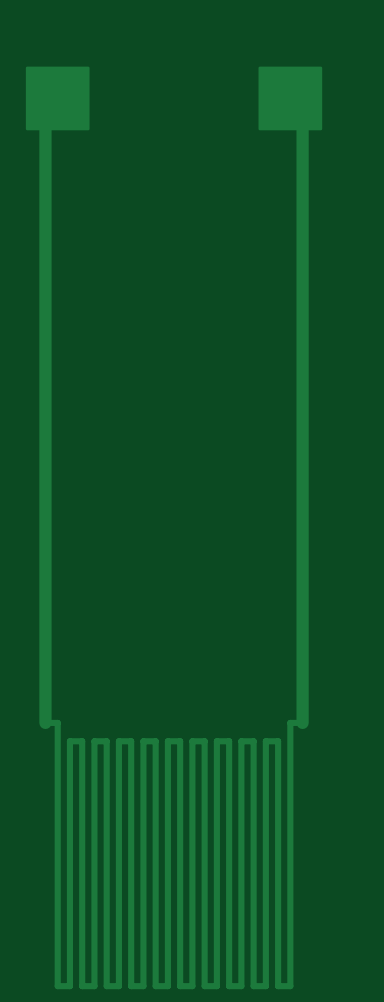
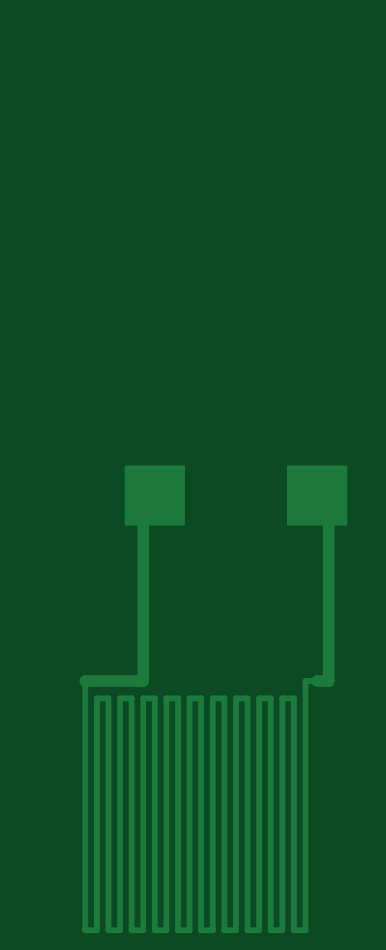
drawing: [25, 66, 90, 131] -> none
drawing: [258, 66, 323, 131] -> none
track: (57, 98) (45, 110) (45, 722) (57, 722) -> (143, 507) (143, 680) (85, 680)
track: (290, 98) (302, 110) (302, 722) -> (328, 507) (328, 680) (317, 680)
drawing: none -> [124, 465, 185, 526]
drawing: none -> [286, 465, 348, 526]

